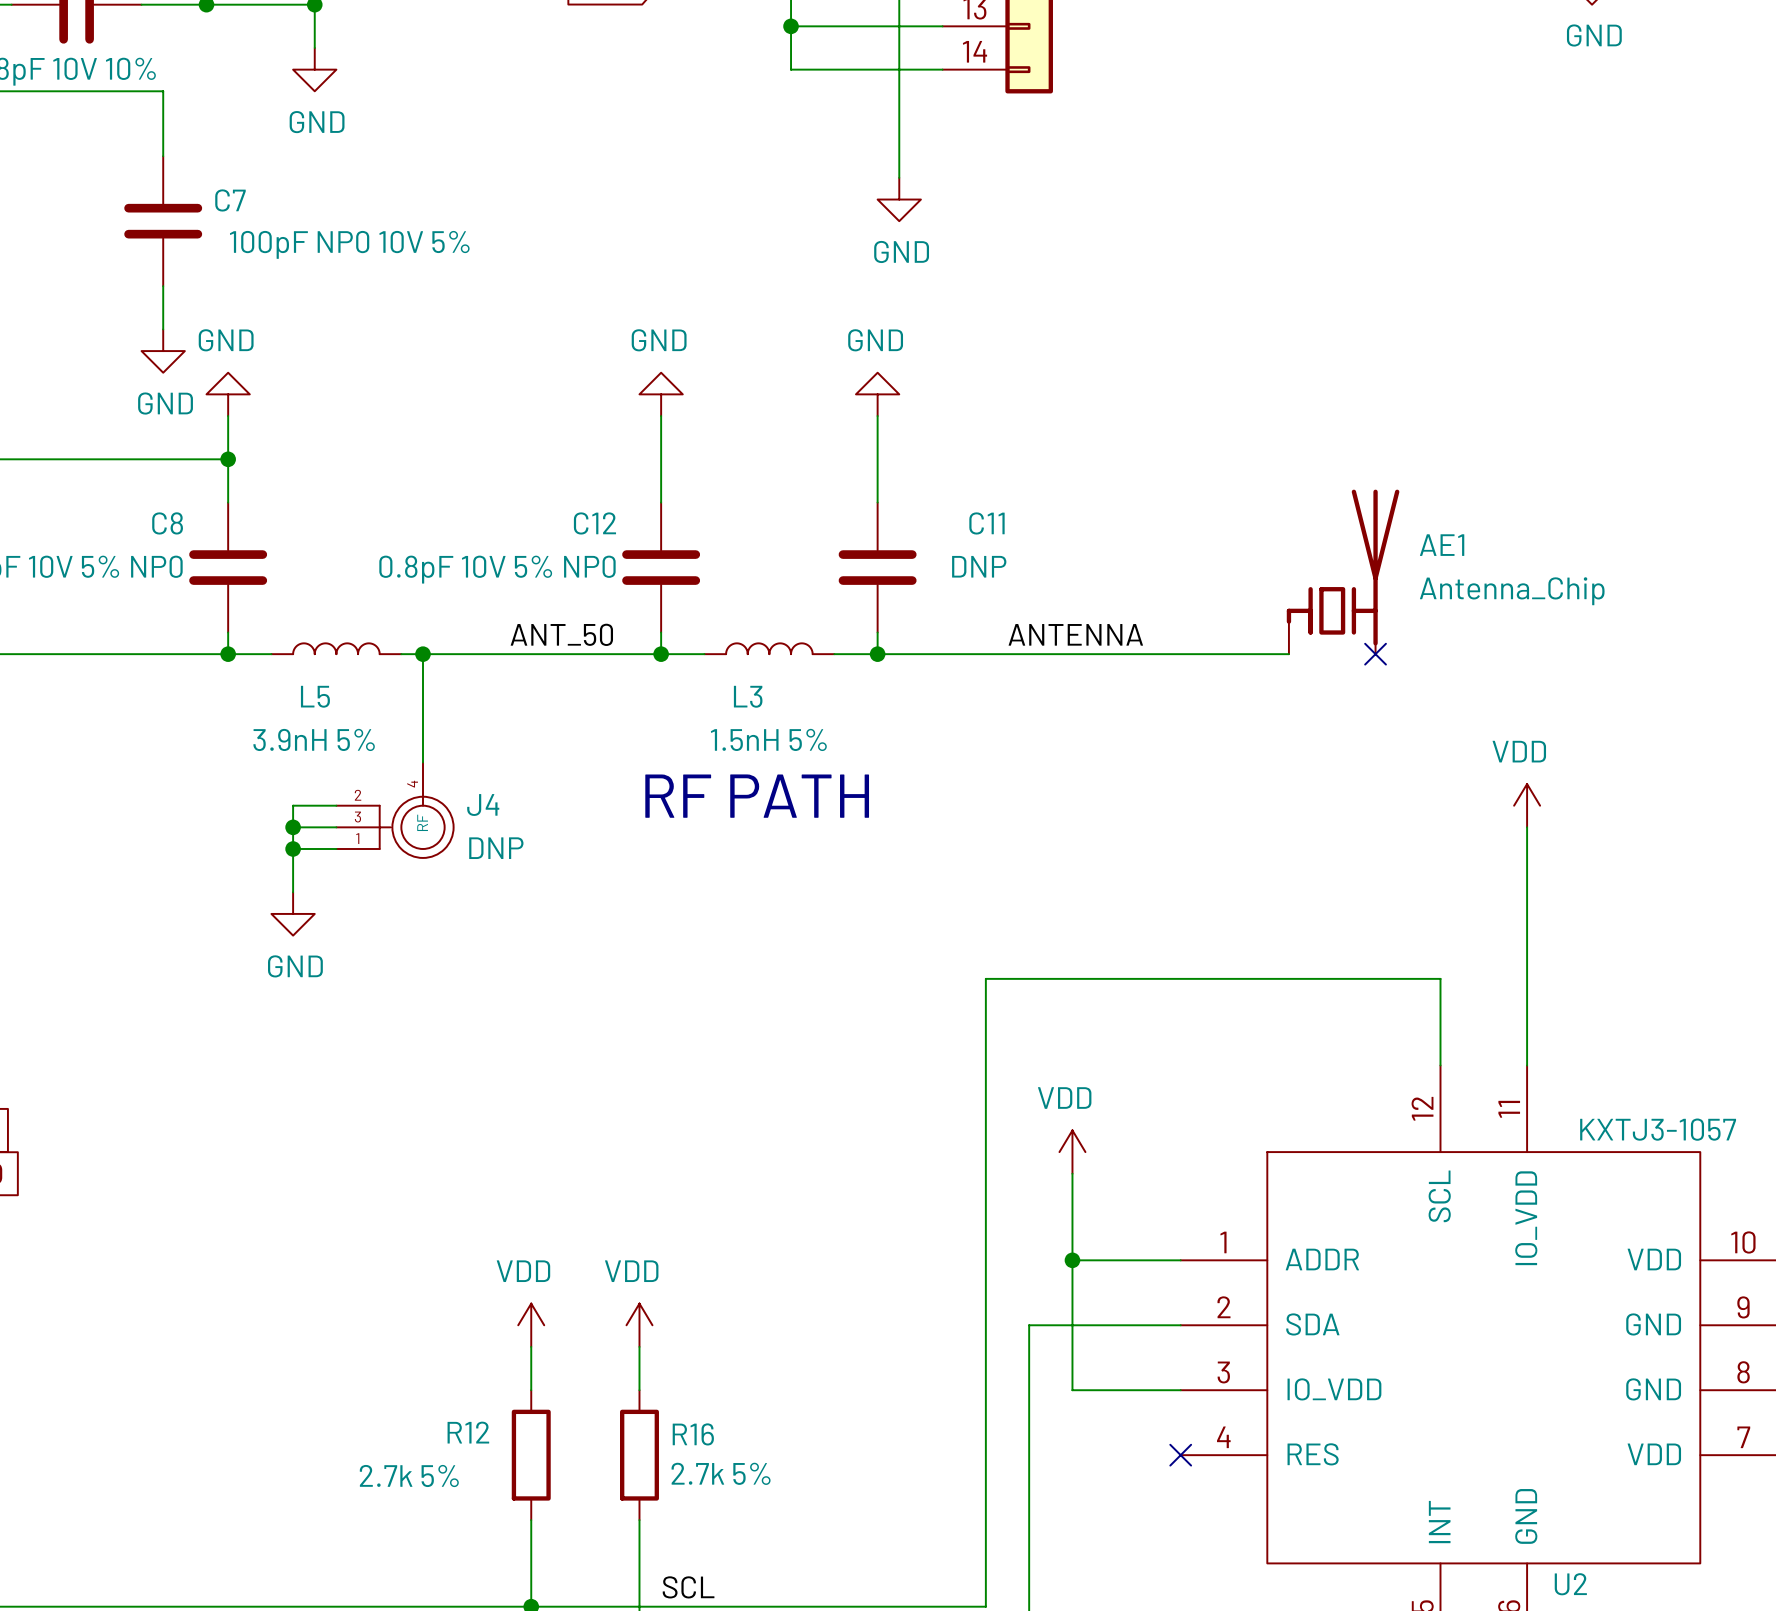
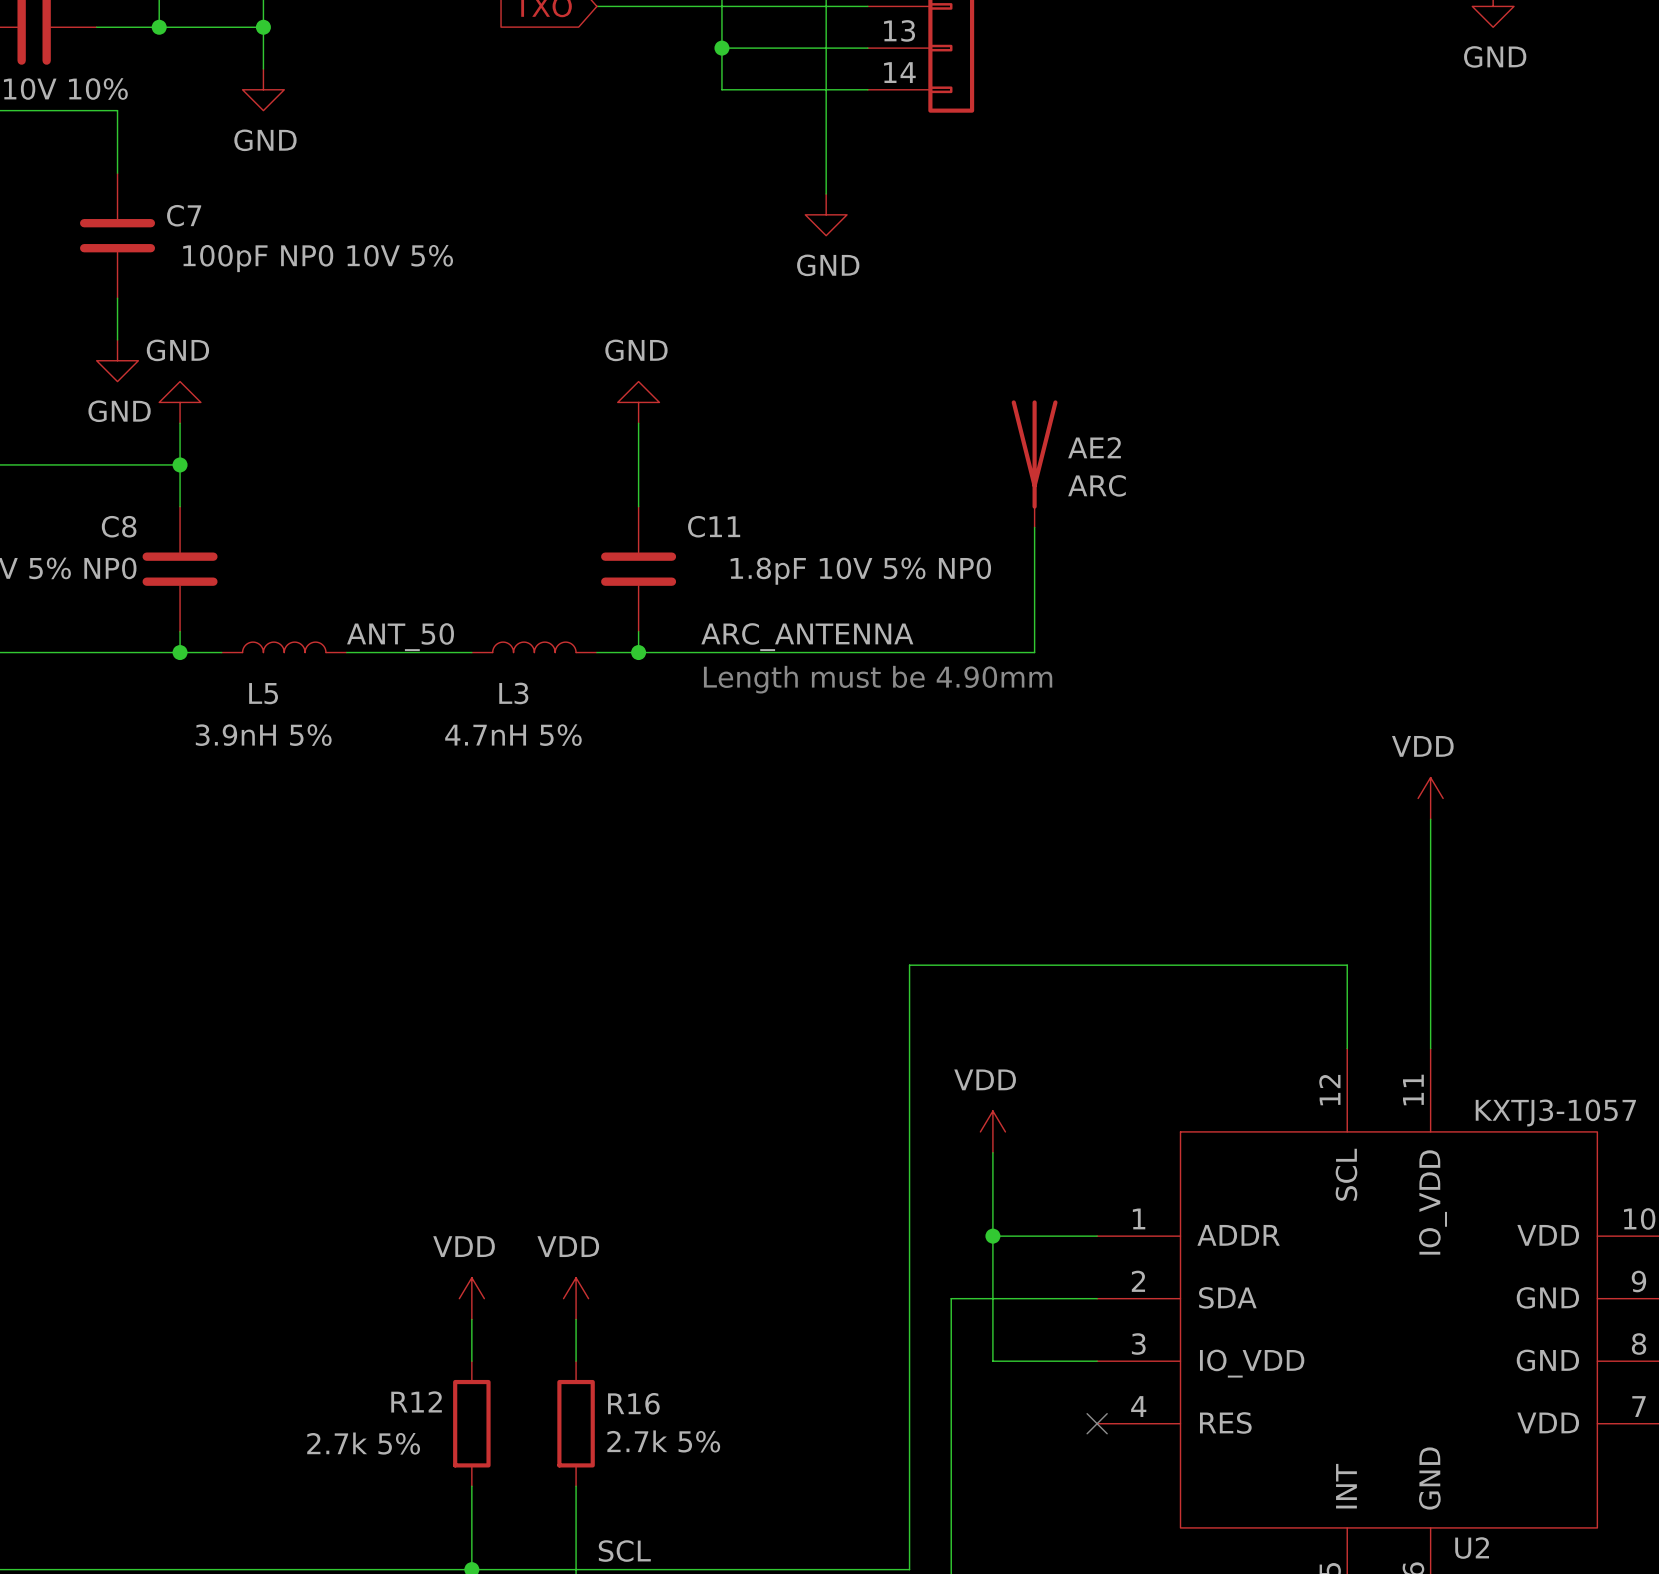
power symbol position: GND (661, 394) -> GND (638, 402)
power symbol: GND (877, 394) -> none
wire: (661, 416) (661, 502) -> (638, 423) (638, 506)
wire: (877, 416) (877, 502) -> none
AE2: none -> ARC (1034, 463)
C11 name position: C11 (986, 523) -> C11 (714, 526)
C11 value: DNP (979, 566) -> 1.8pF 10V 5% NP0 (860, 571)
C12: 0.8pF 10V 5% NP0 (661, 567) -> none
C11 position: (877, 567) -> (638, 569)
AE1: Antenna_Chip (1343, 571) -> none
wire: (661, 632) (661, 654) (531, 654) -> none
wire: none -> (638, 631) (638, 652) (763, 652)
wire: (877, 632) (877, 654) -> none
label position: ANT_50 (561, 634) -> ANT_50 (400, 637)
label: ANTENNA (1075, 634) -> ARC_ANTENNA (807, 637)
L3 position: (769, 648) -> (534, 647)
wire: (423, 654) (423, 762) -> none
junction: (423, 654) -> none
junction position: (661, 654) -> (638, 652)
junction: (877, 654) -> none
wire: (1115, 654) (1288, 654) -> (1034, 652) (1034, 527)
no-connect mark: (1375, 654) -> none
text: none -> Length must be 4.90mm (878, 679)
L3 value: 1.5nH 5% (768, 739) -> 4.7nH 5% (513, 735)
text: RF PATH (757, 796) -> none
wire: (336, 805) (293, 805) (293, 892) -> none
J4: DNP (395, 810) -> none
wire: (293, 827) (336, 827) -> none
junction: (293, 827) -> none
wire: (293, 848) (336, 848) -> none
junction: (293, 848) -> none
power symbol: GND (293, 913) -> none

